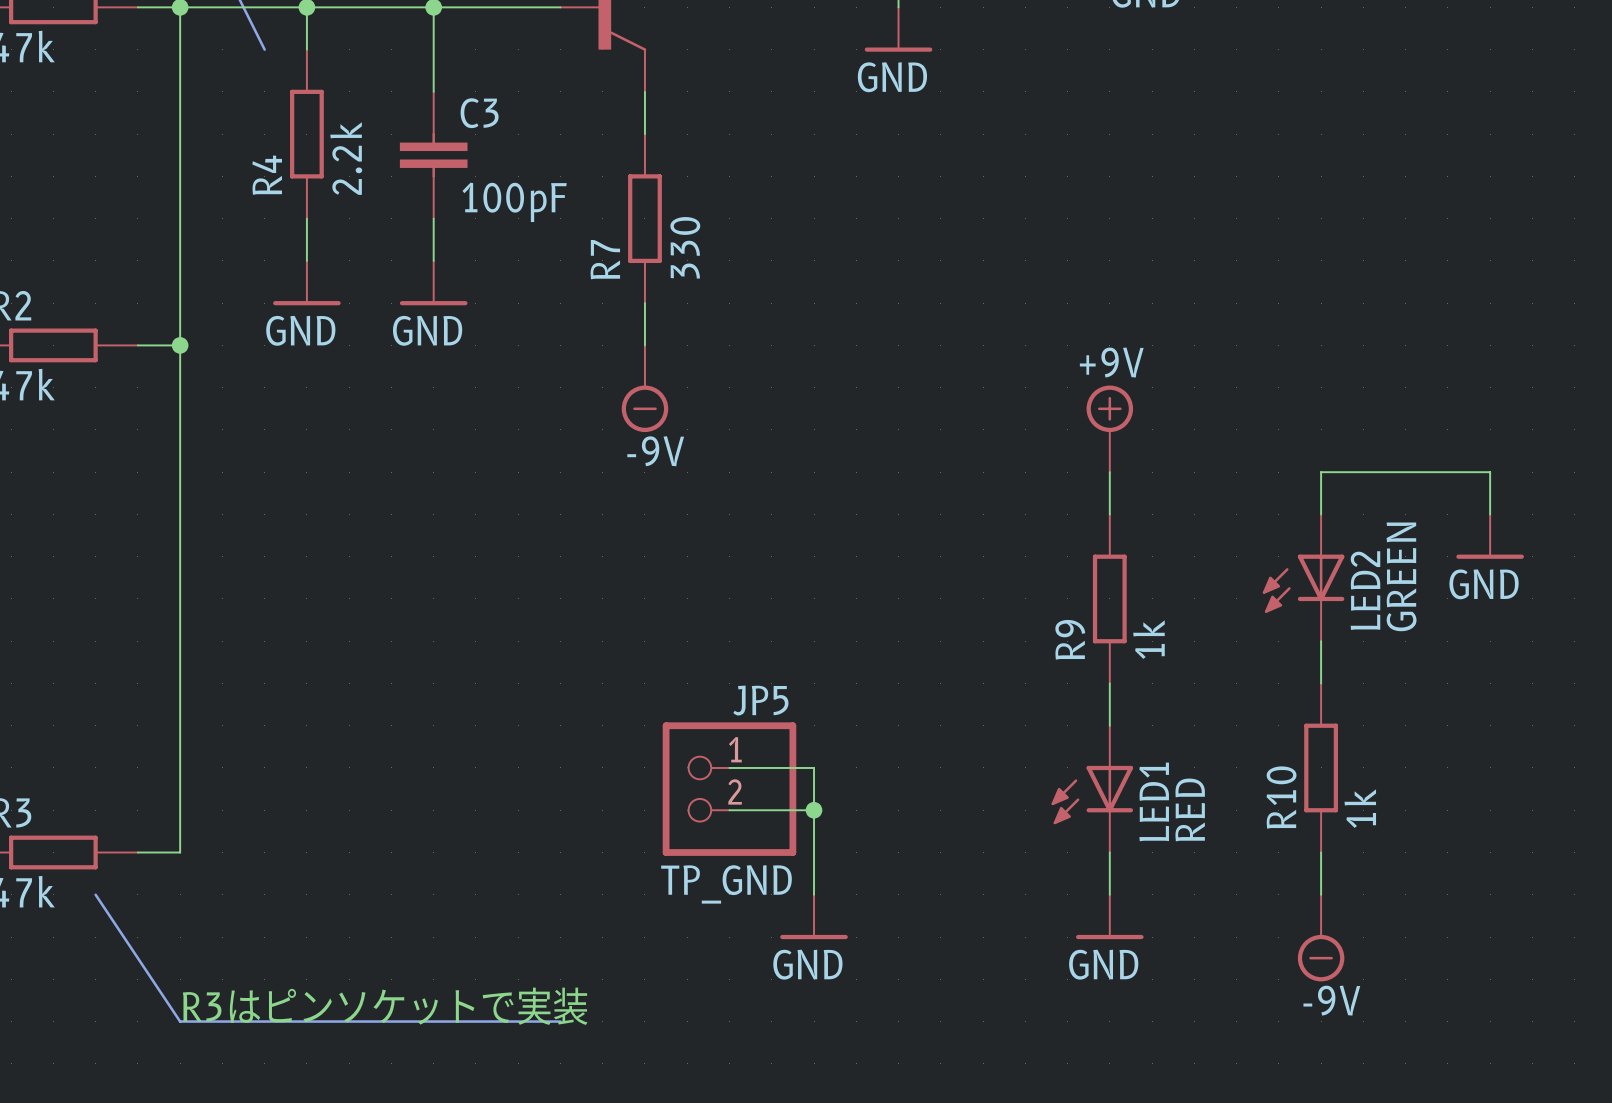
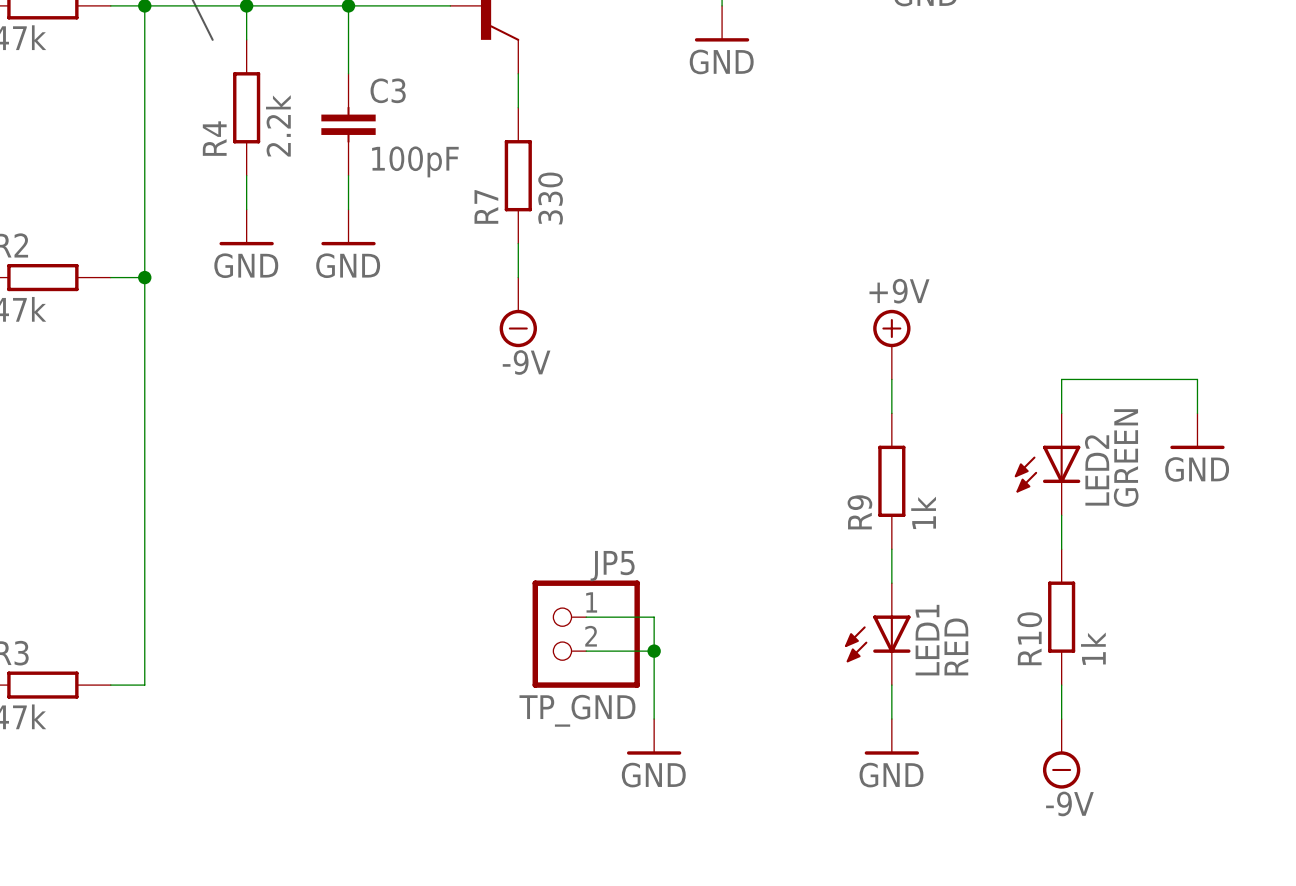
line: (95, 894) (180, 1021) (560, 1021) -> none
text: R3はピンソケットで実装 (385, 1006) -> none

